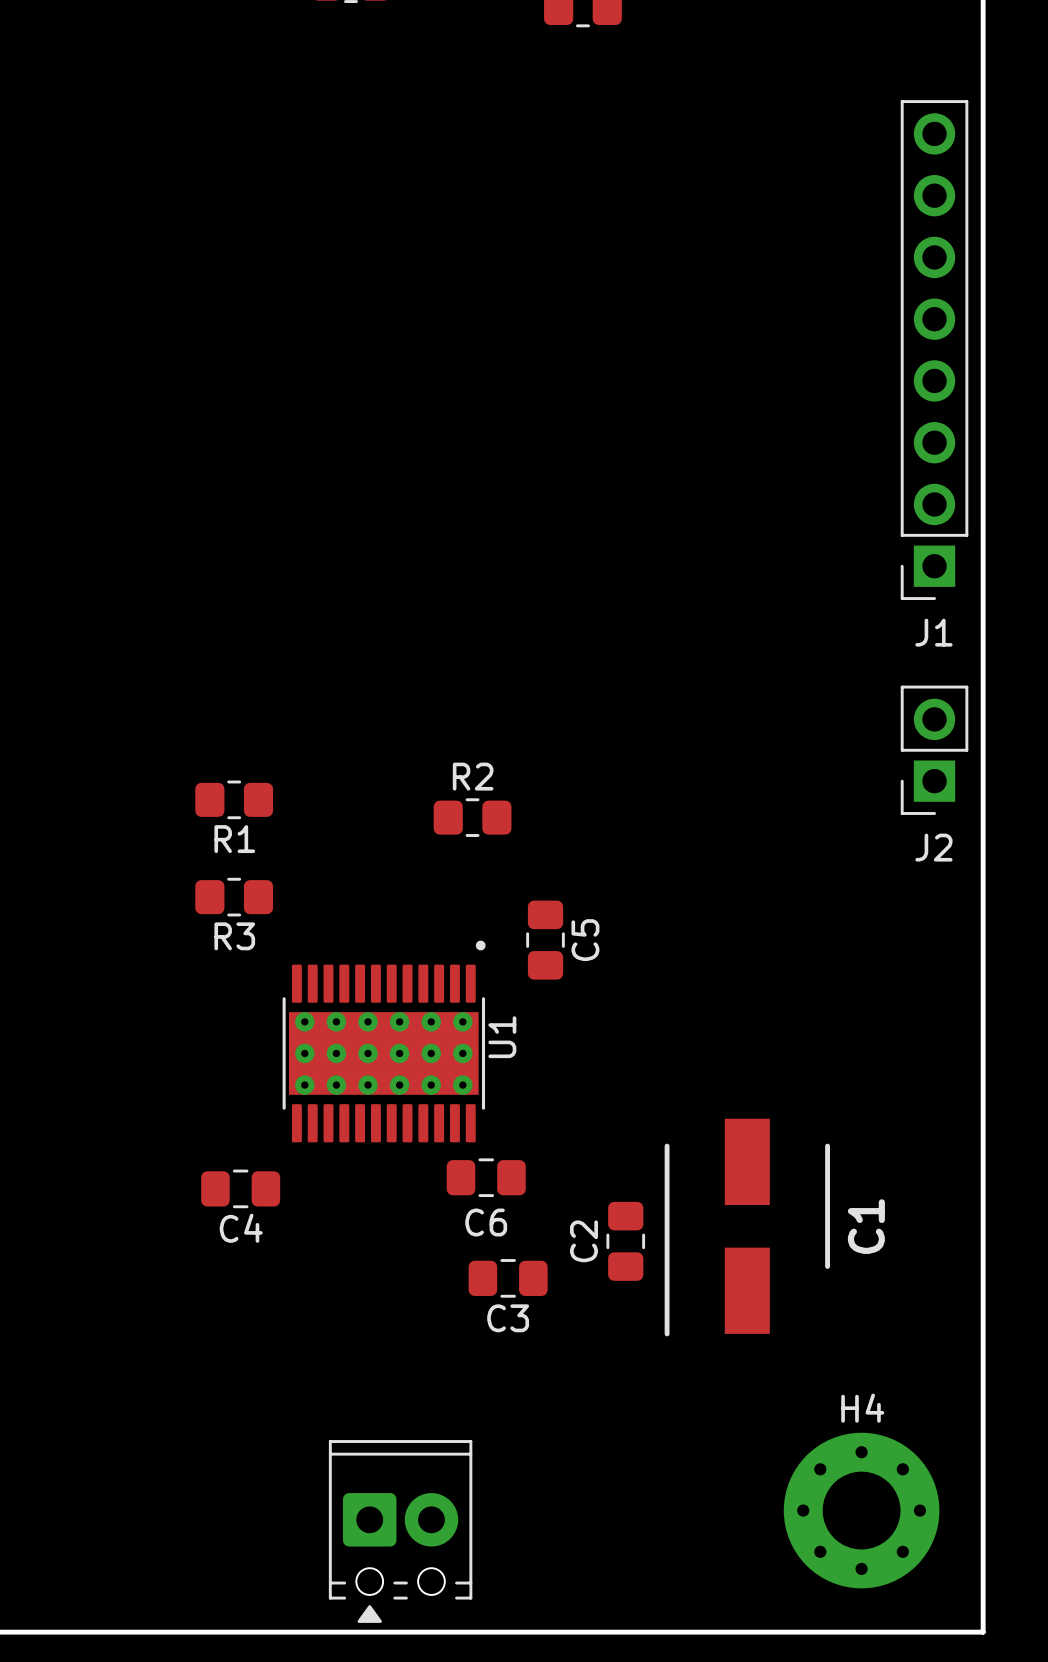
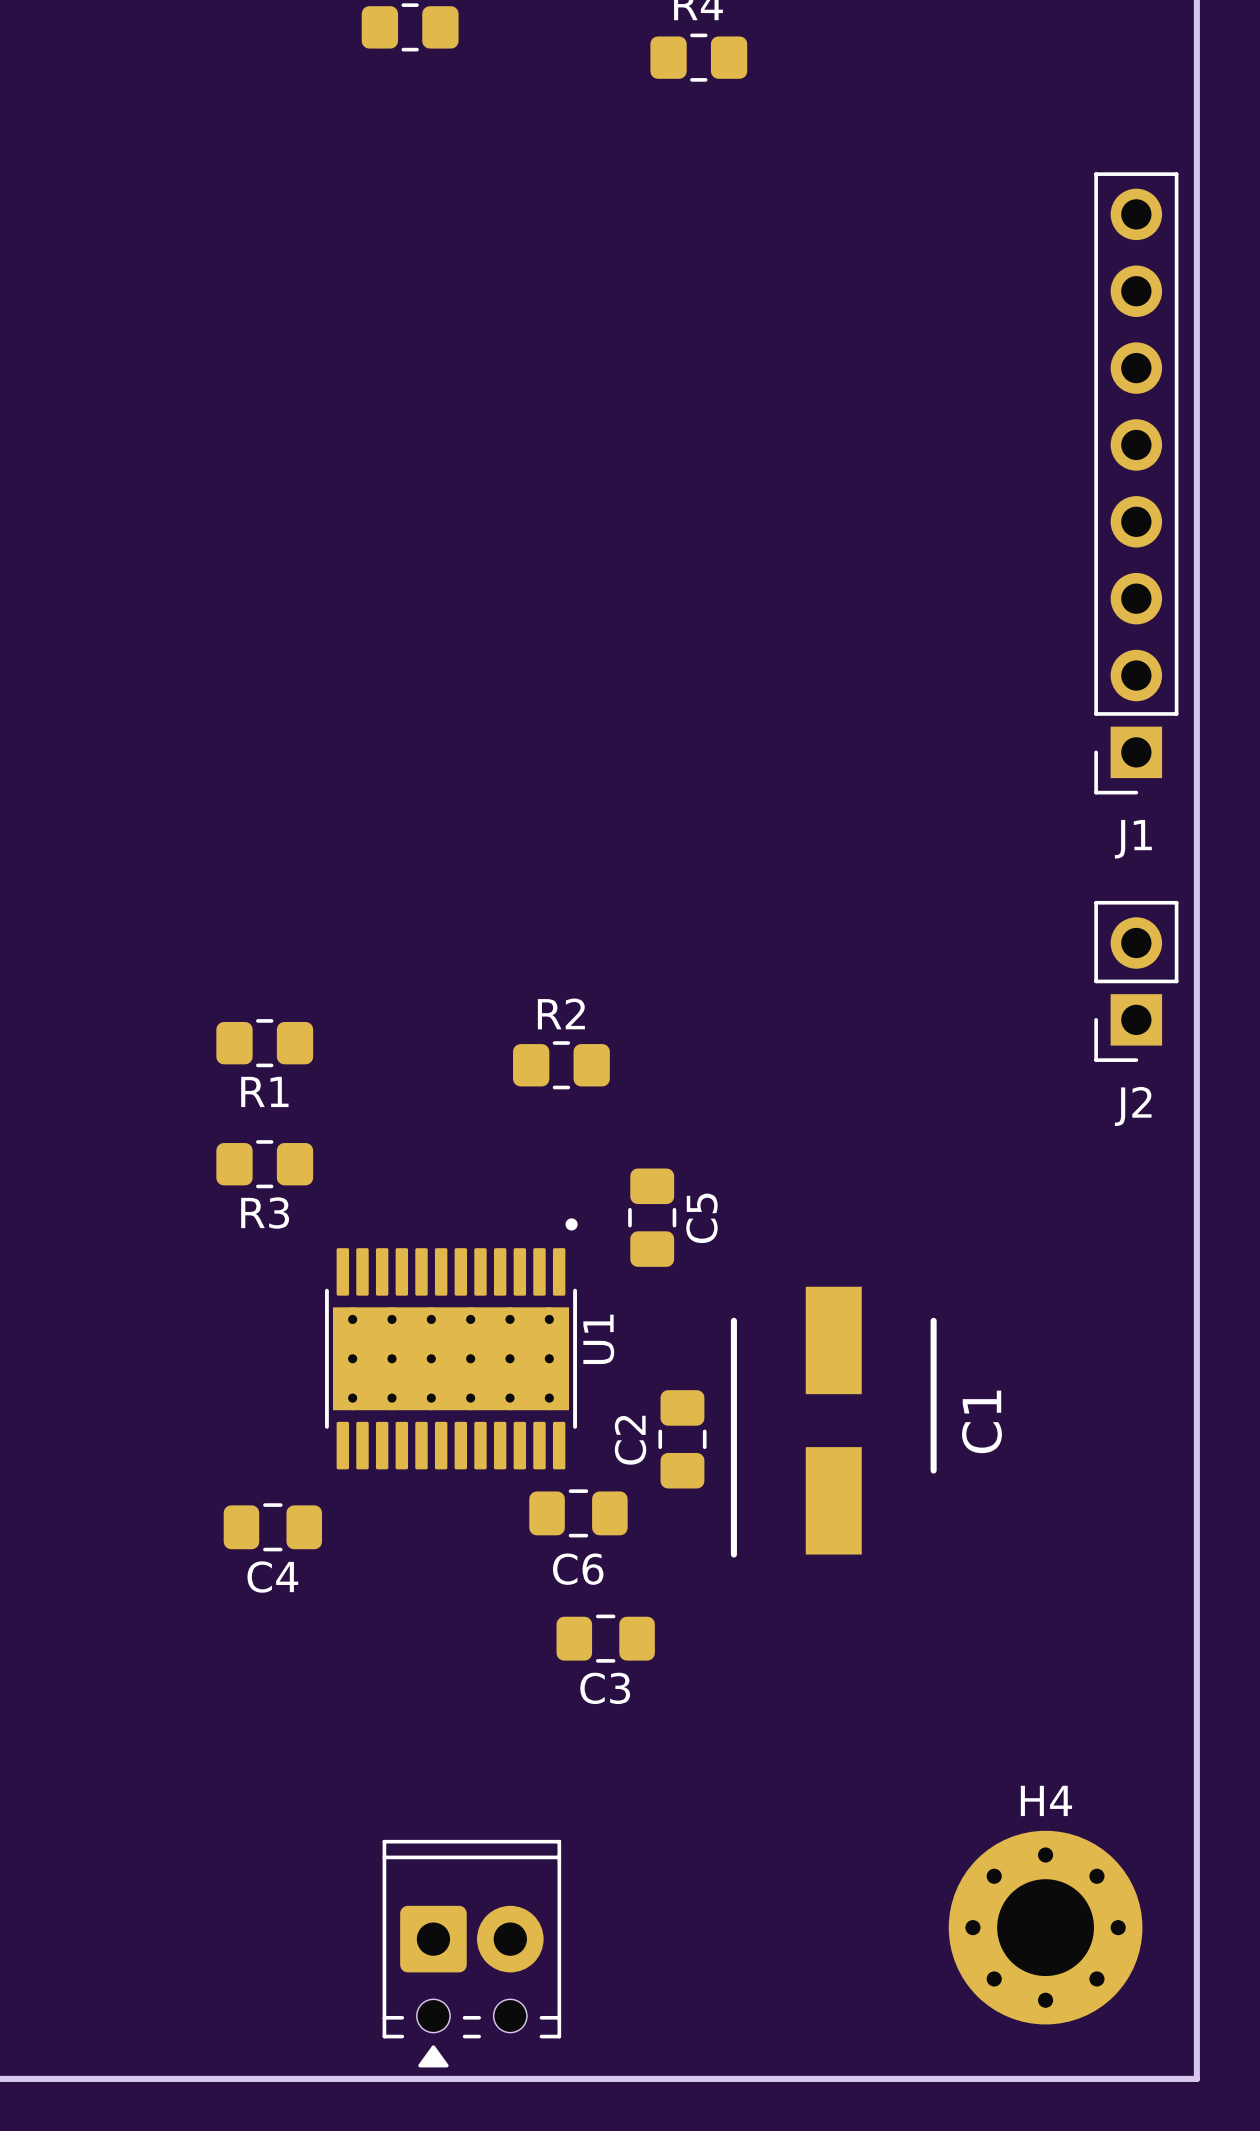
C1 position: (747, 1227) -> (833, 1422)
C2 position: (625, 1241) -> (682, 1439)

